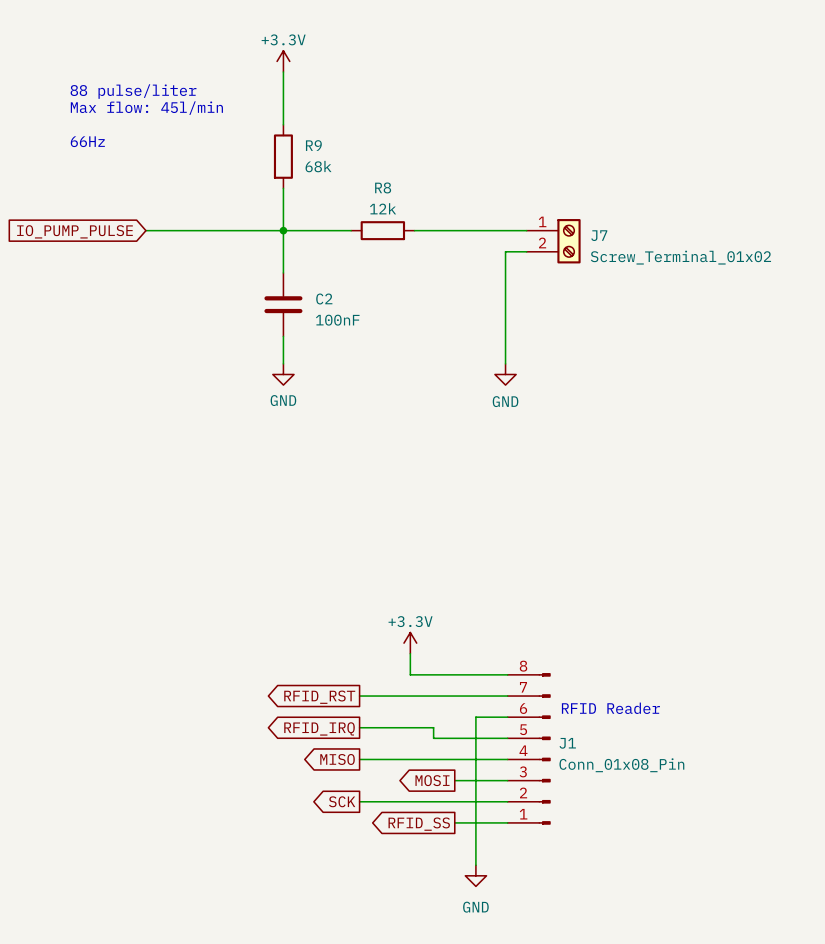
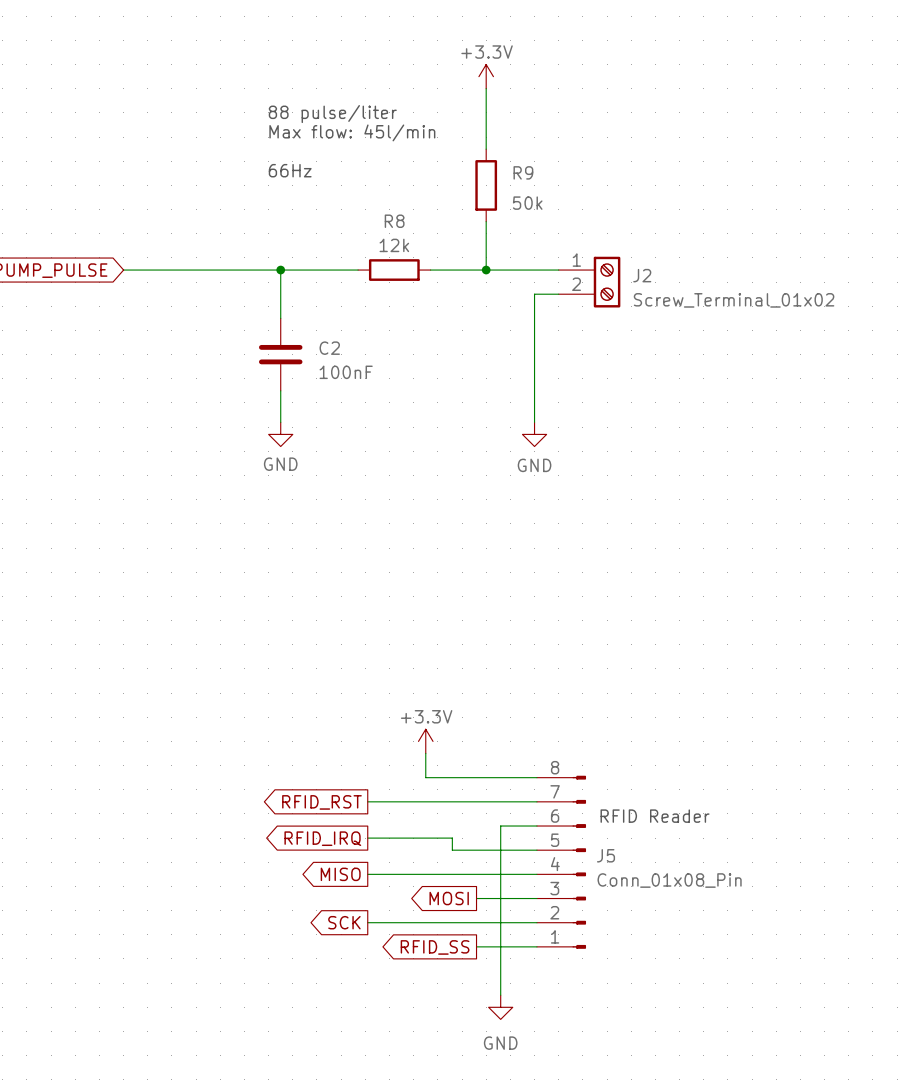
power symbol position: +3.3V (283, 61) -> +3.3V (486, 76)
wire: (283, 72) (283, 124) -> (486, 88) (486, 149)
text position: 88 pulse/liter (133, 91) -> 88 pulse/liter (332, 114)
text position: Max flow: 45l/min (146, 108) -> Max flow: 45l/min (352, 132)
text position: 66Hz (87, 141) -> 66Hz (290, 170)
R9 position: (283, 156) -> (486, 185)
R9 value: 68k (318, 166) -> 50k (527, 203)
wire: (283, 188) (283, 230) -> (486, 221) (486, 270)
junction: none -> (486, 270)
J7 name: J7 (599, 235) -> J2 (642, 275)
J1 name: J1 (567, 743) -> J5 (606, 855)

